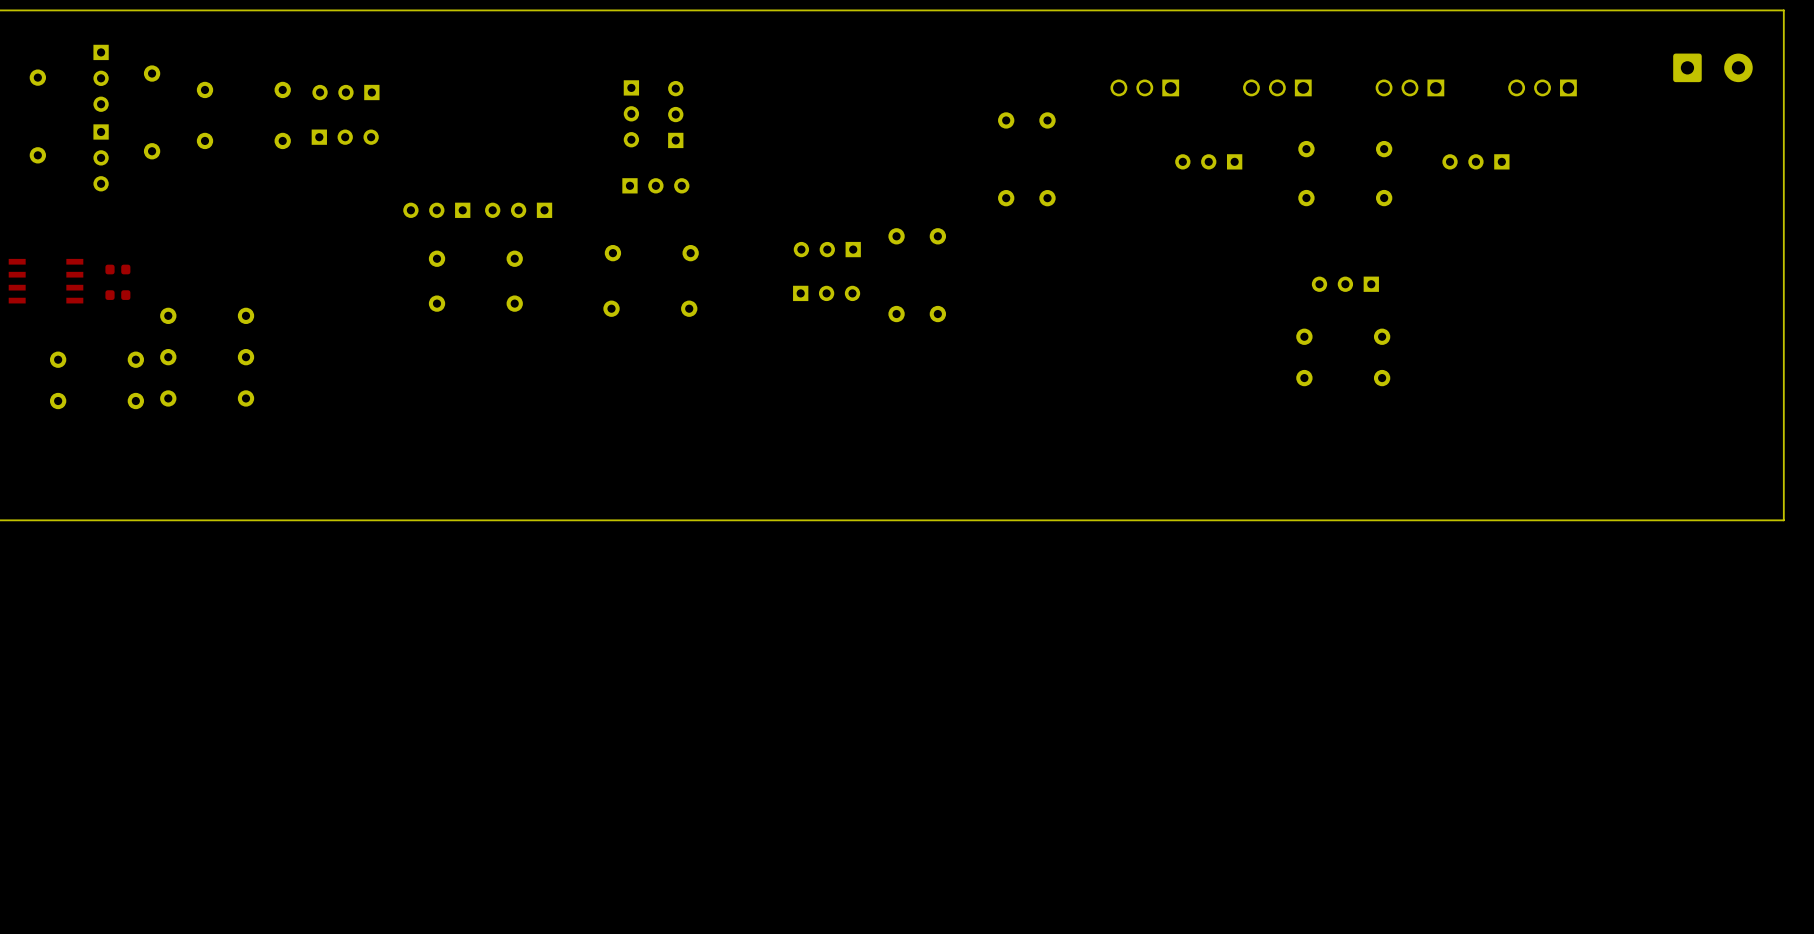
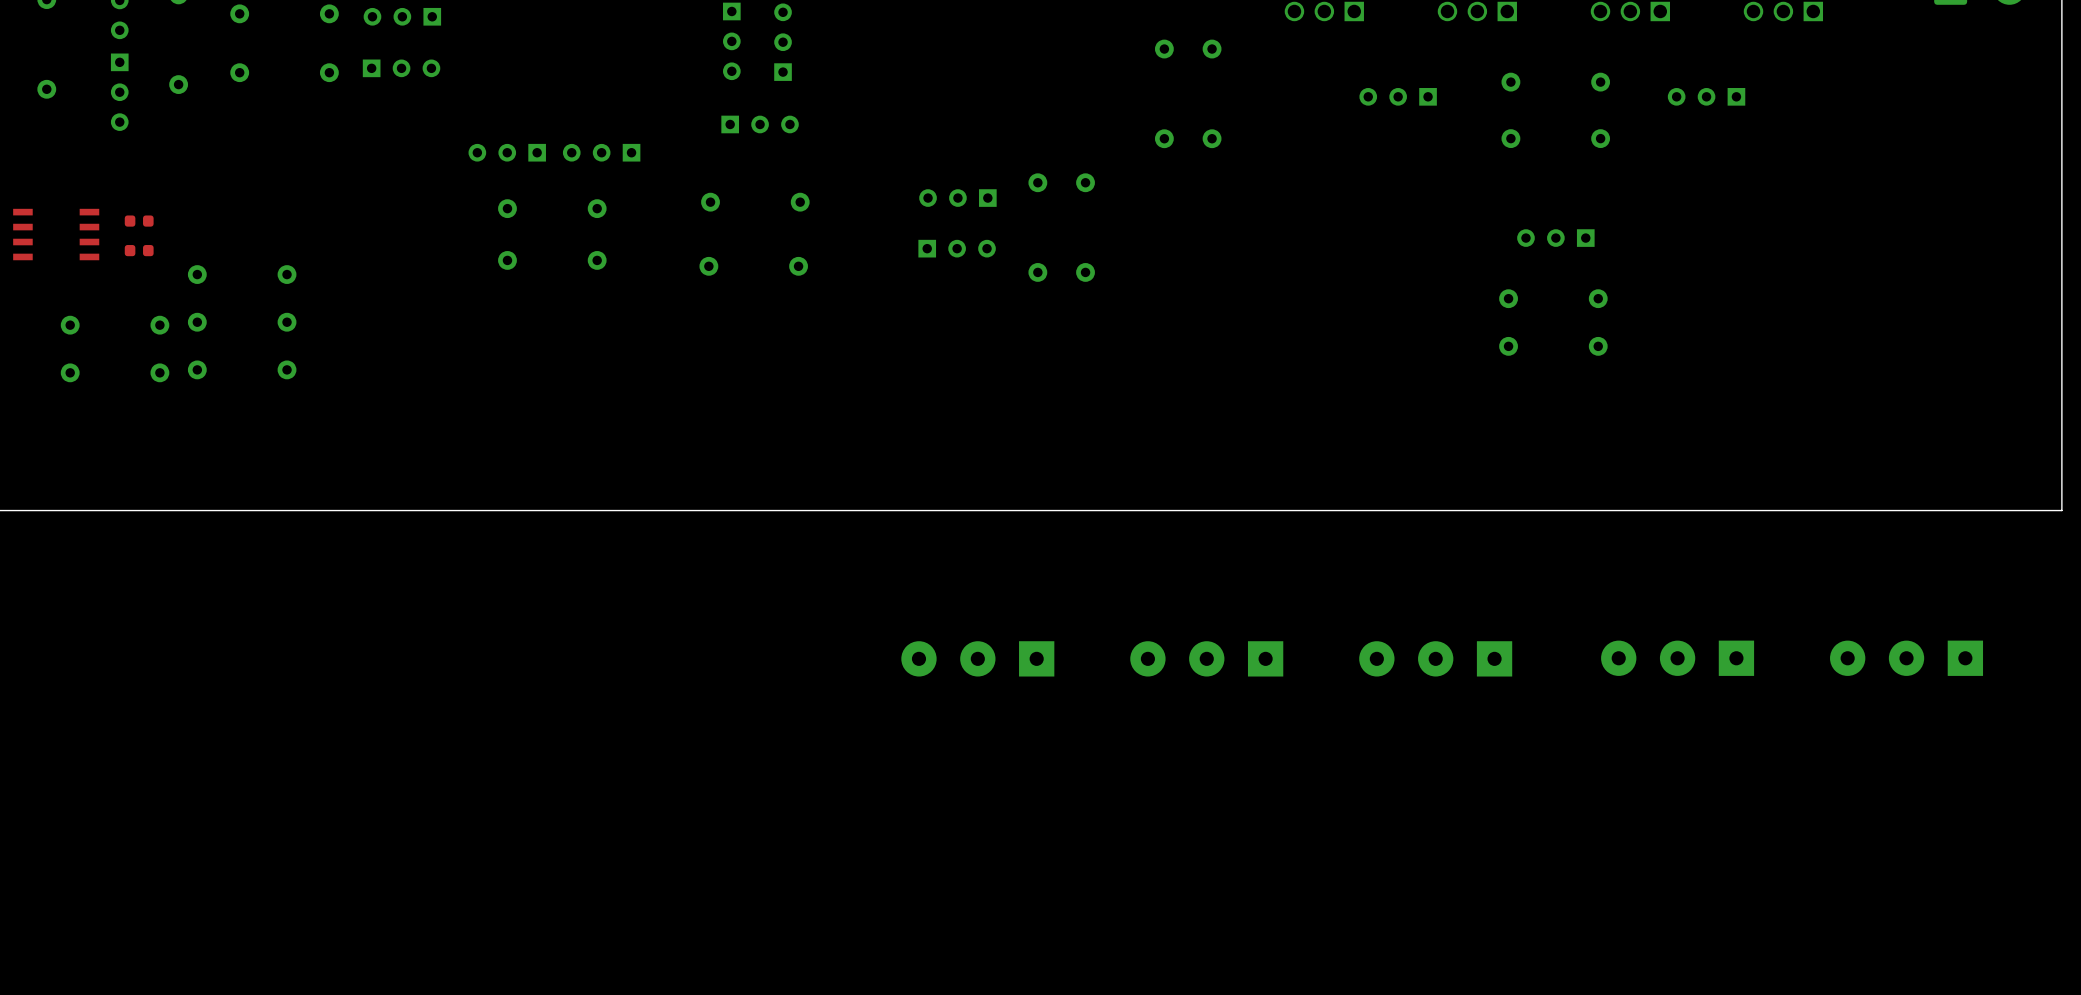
part: none -> (977, 658)
part: none -> (1206, 658)
part: none -> (1435, 658)
part: none -> (1677, 658)
part: none -> (1906, 658)

